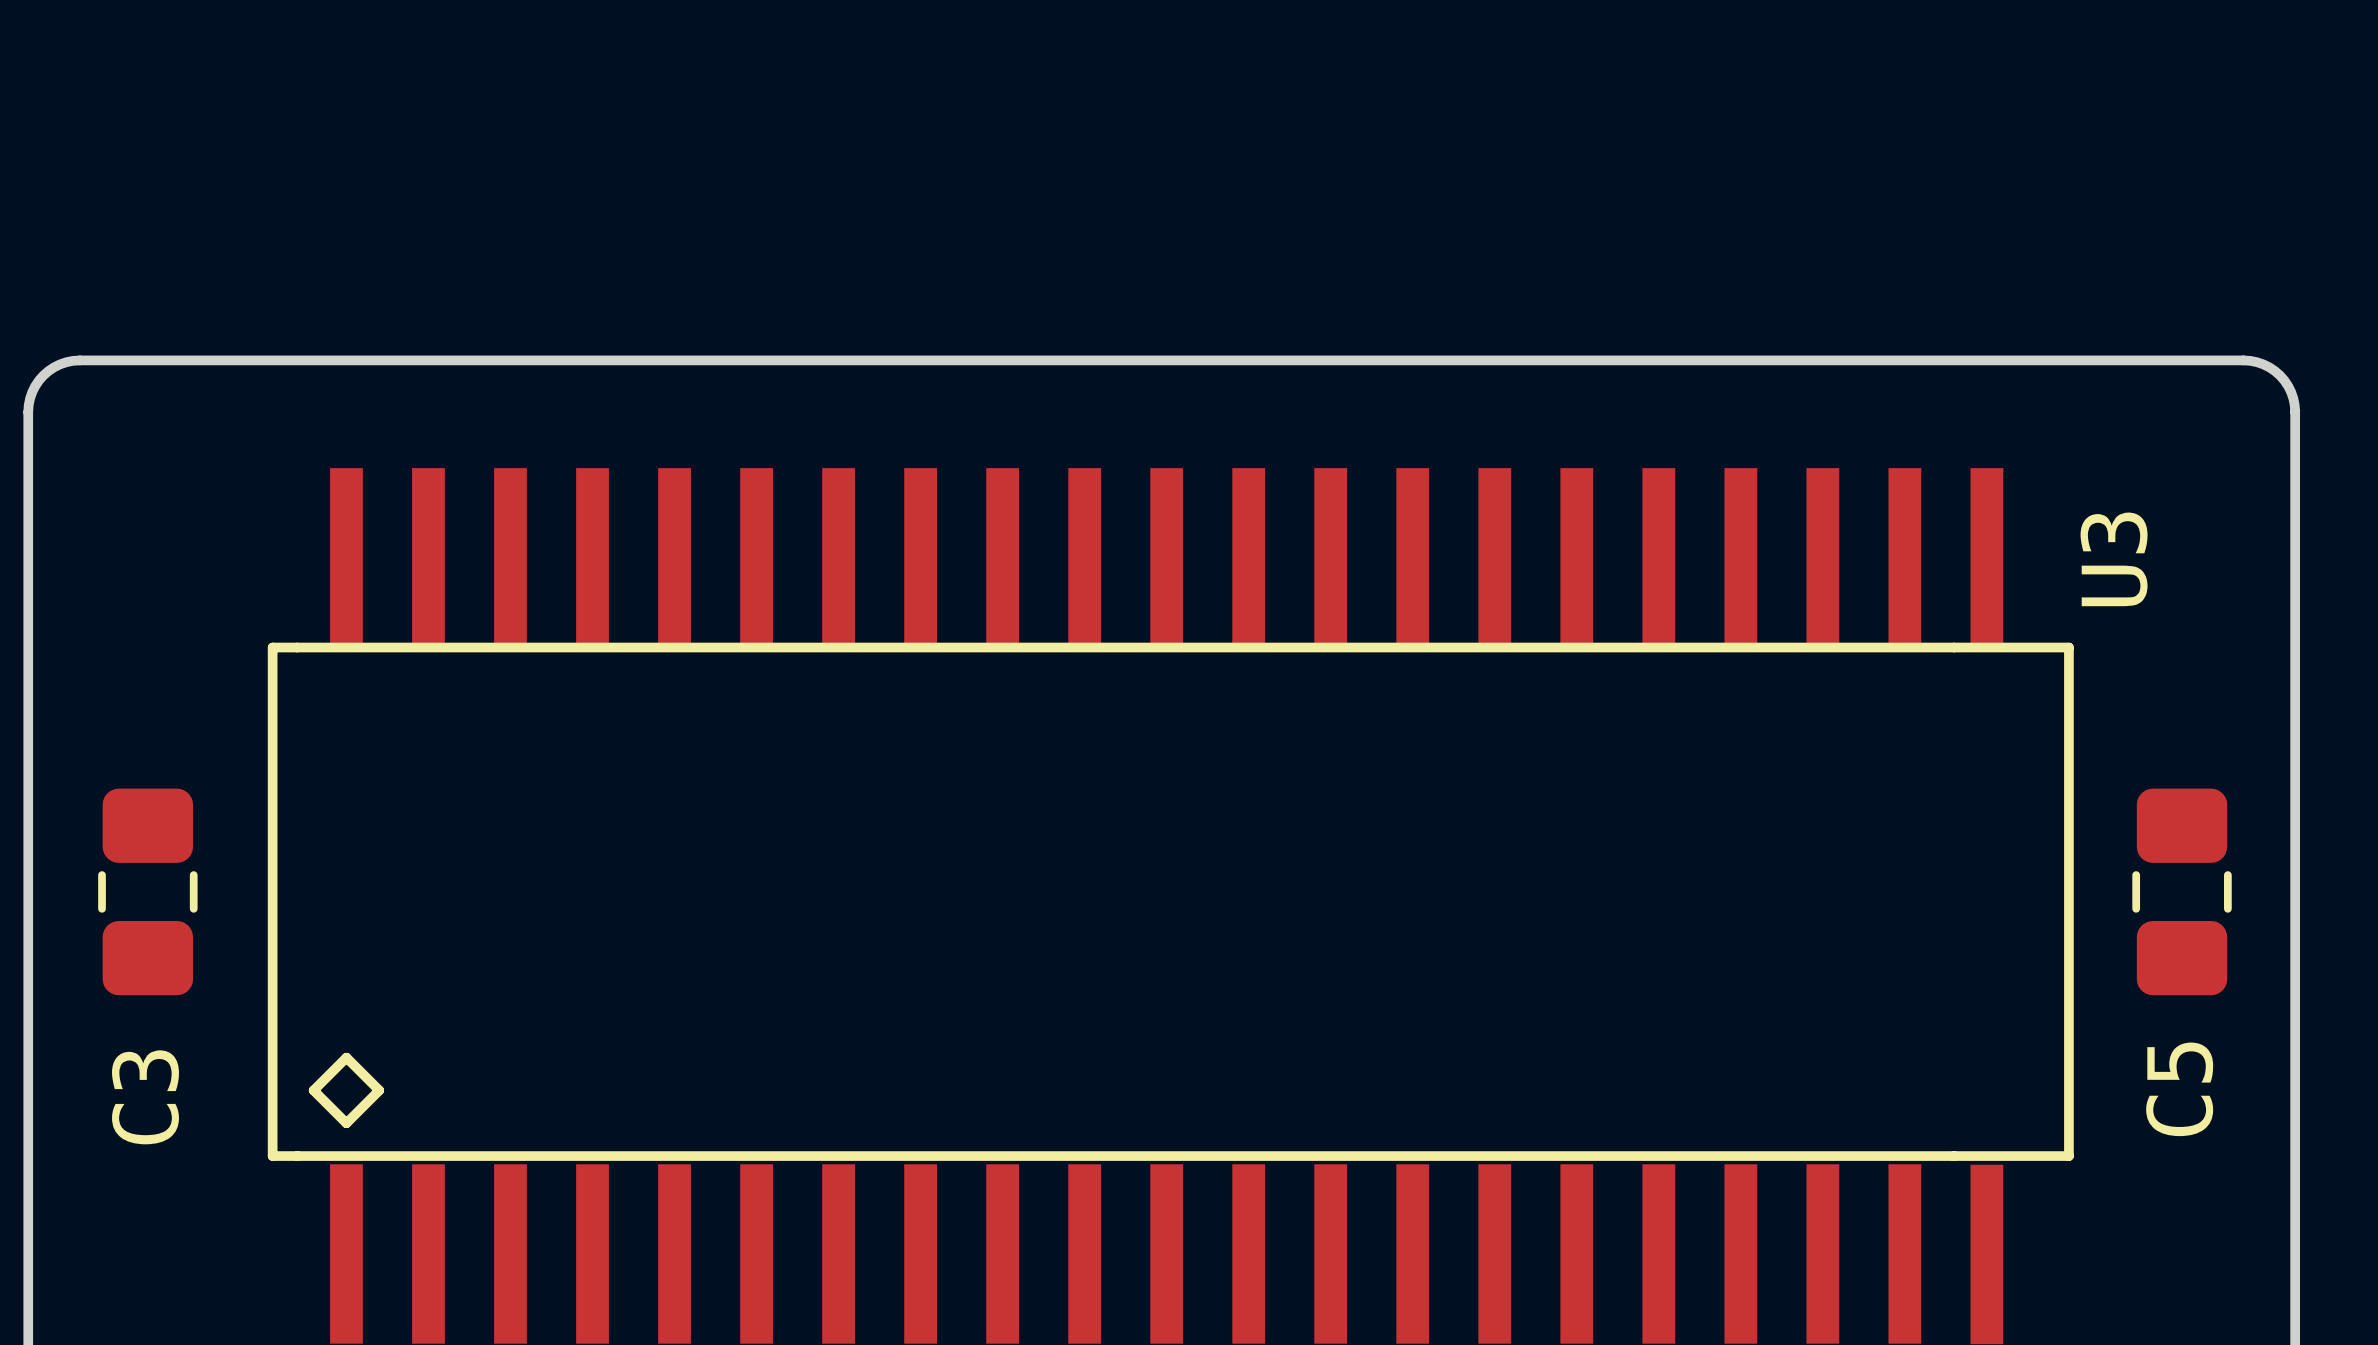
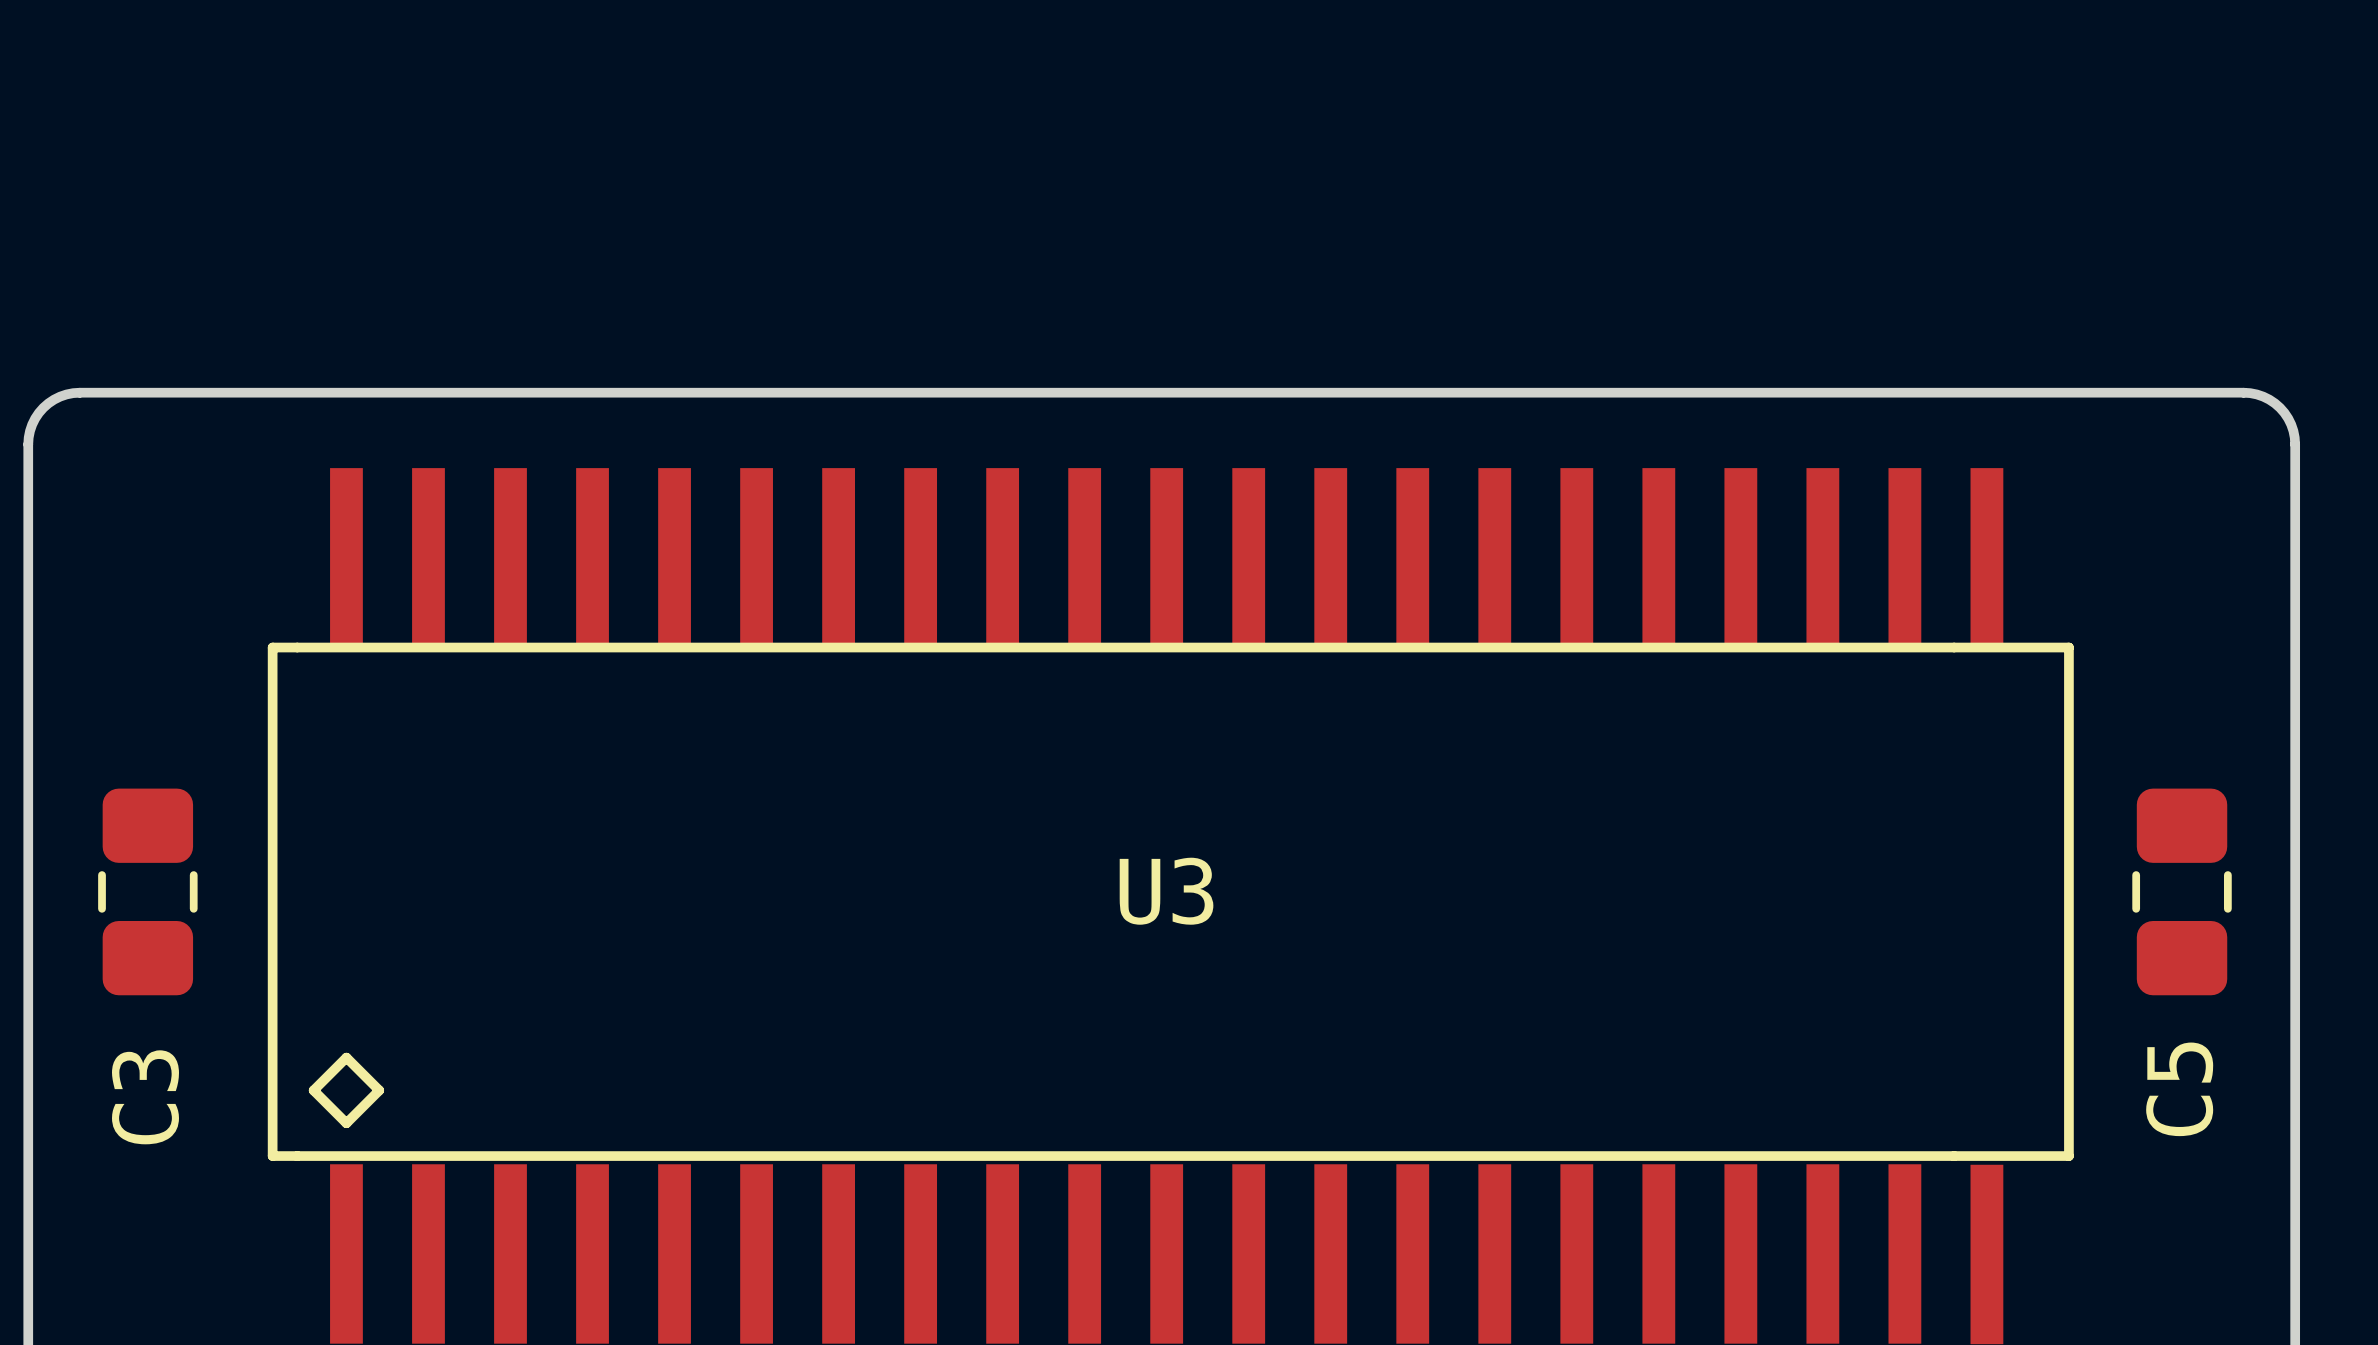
board edge: (28, 444) (28, 405) (35, 386) (43, 375) (54, 367) (66, 362) (79, 360) (2243, 360) (2256, 362) (2269, 367) (2280, 375) (2288, 386) (2294, 405) (2295, 444) -> (28, 444) (32, 424) (43, 407) (60, 396) (79, 392) (2243, 392) (2263, 396) (2280, 407) (2291, 424) (2295, 444)
U3 name rotation: 0° (2114, 559) -> 90° clockwise (1166, 891)
U3 name position: U3 (2114, 559) -> U3 (1166, 891)

